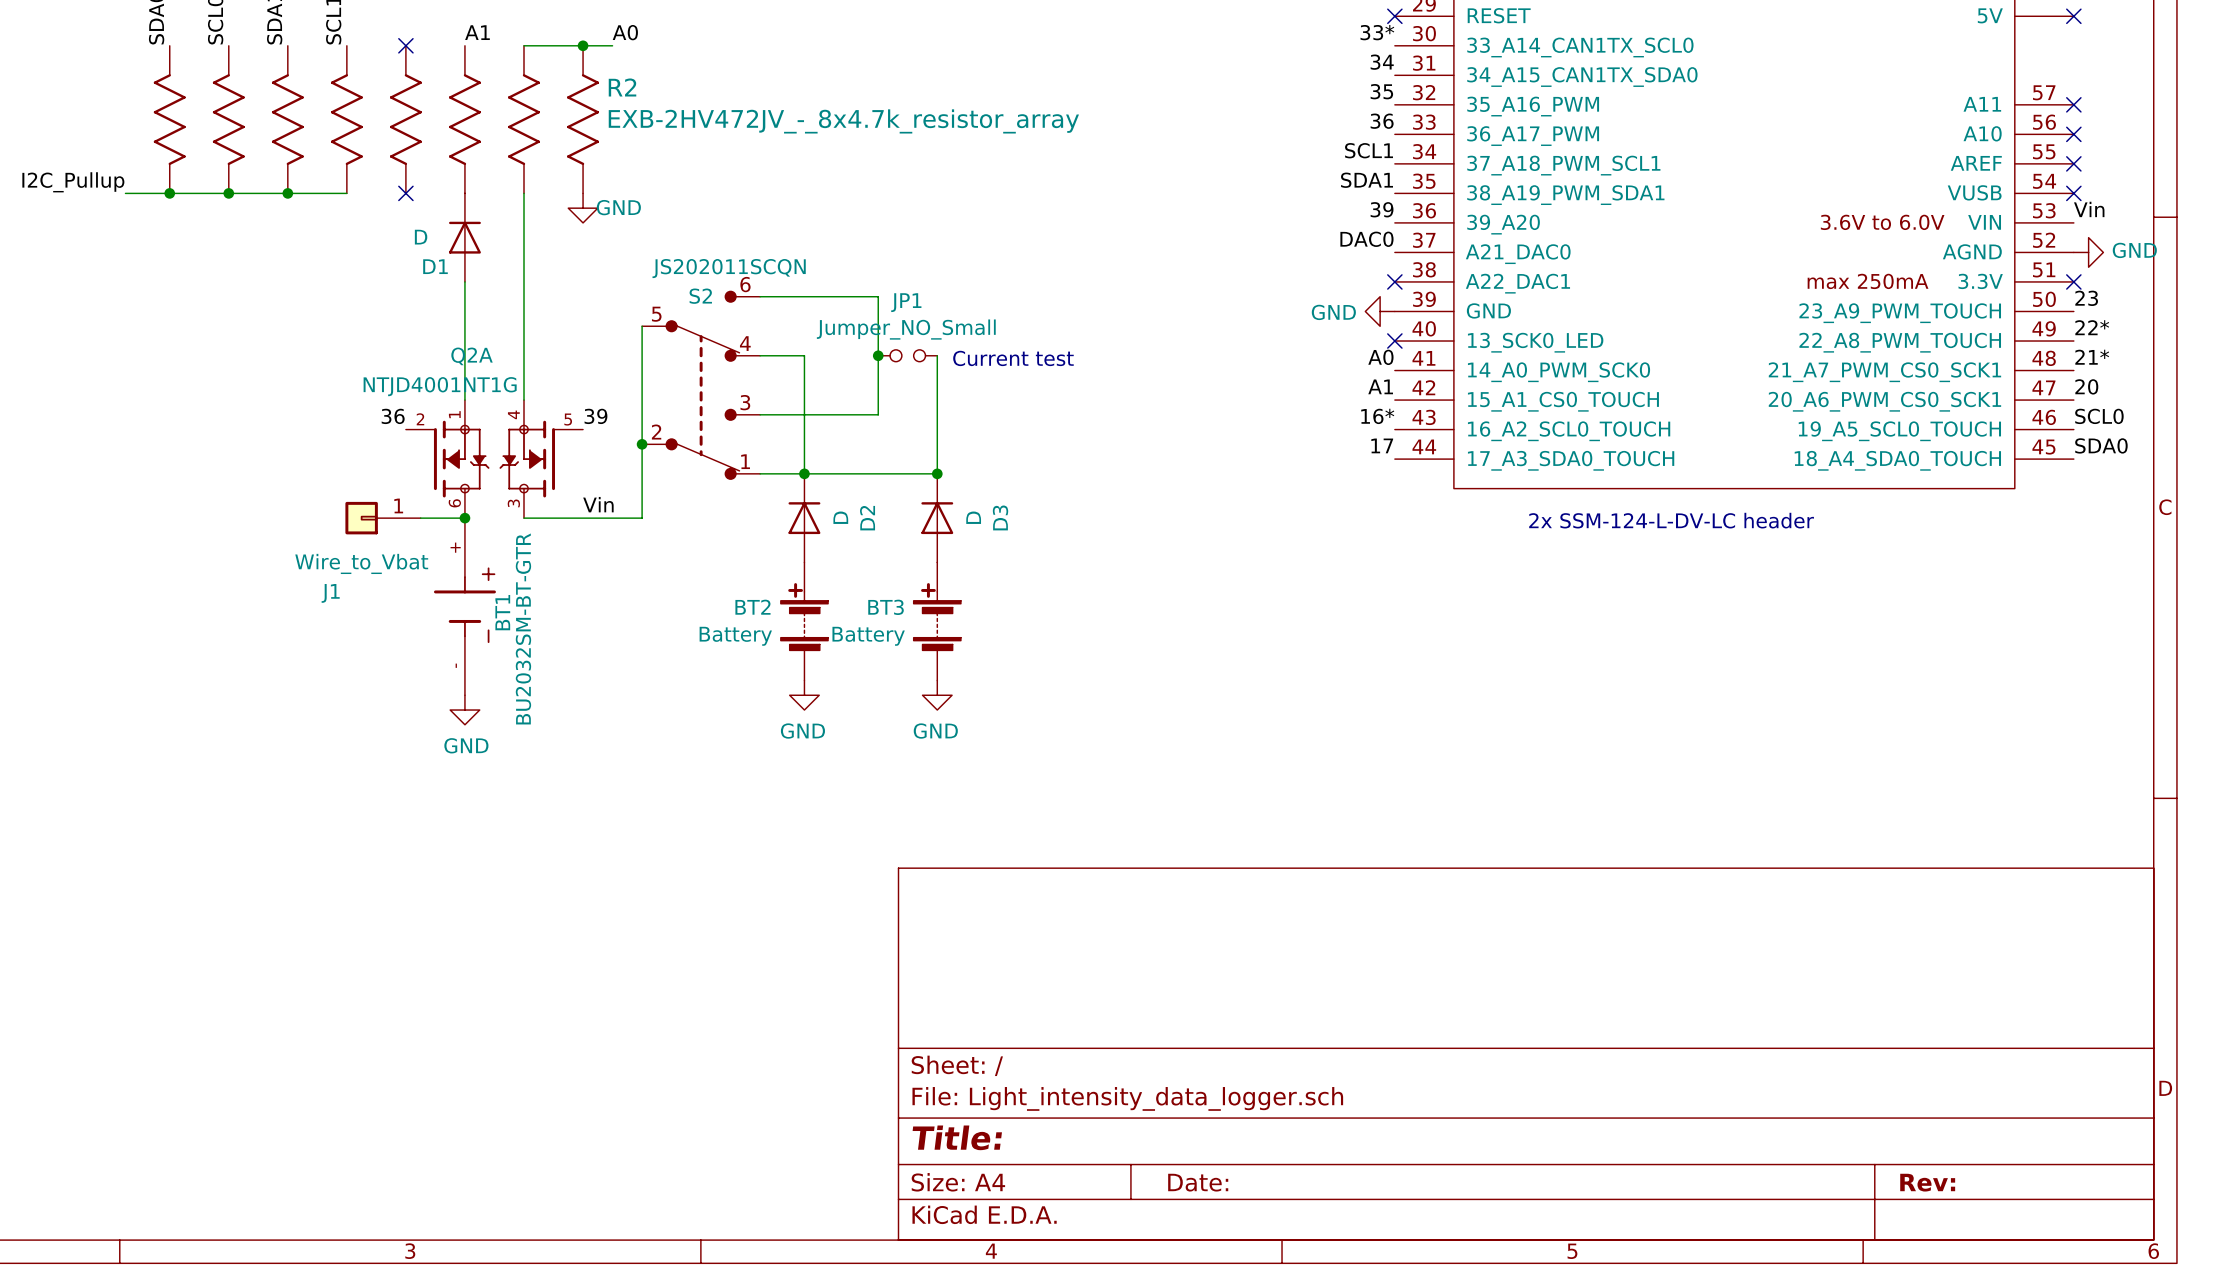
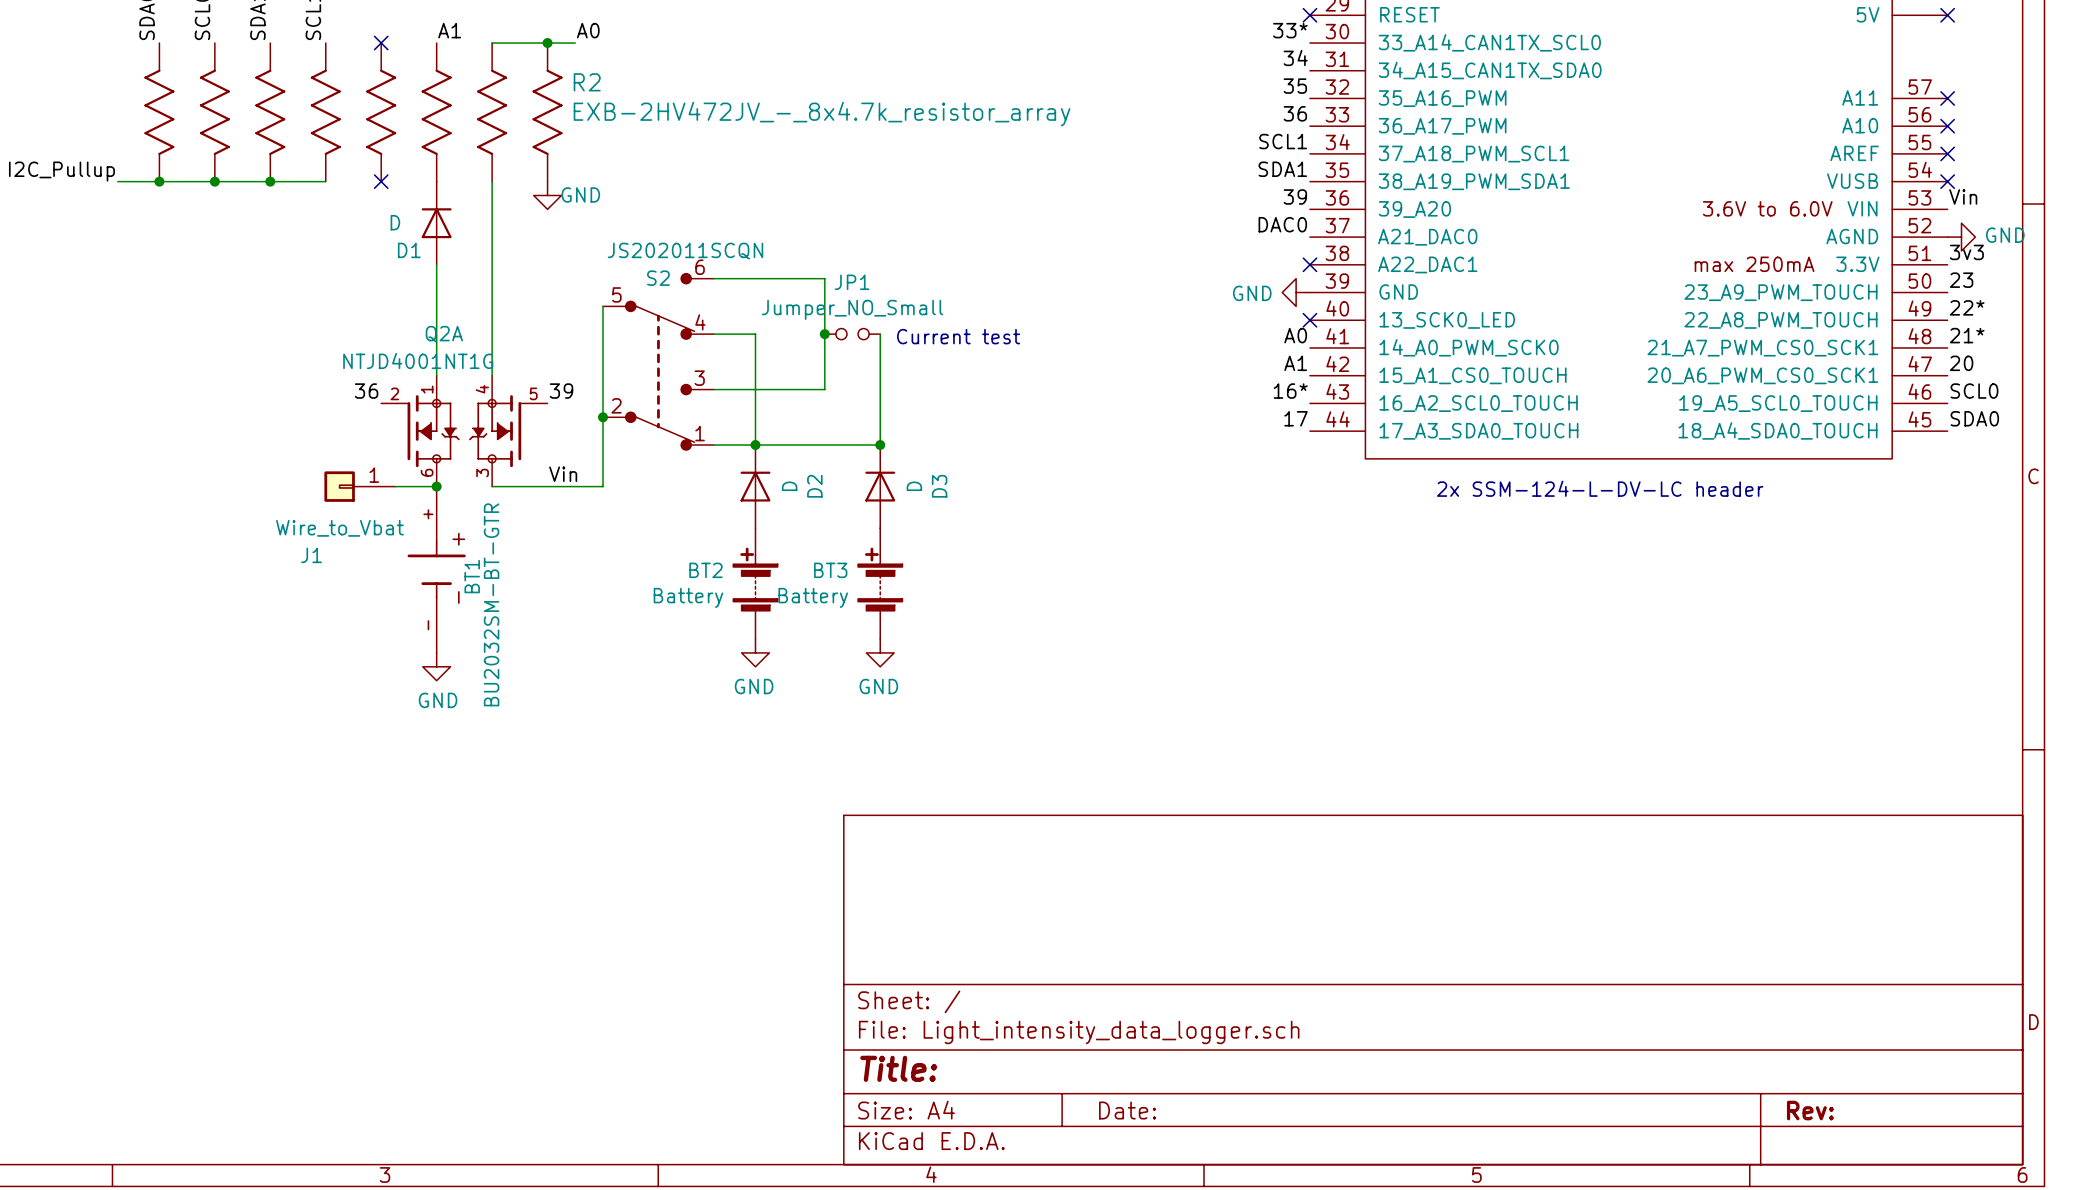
label: none -> 3v3 (1966, 252)
no-connect mark: (2073, 281) -> none

